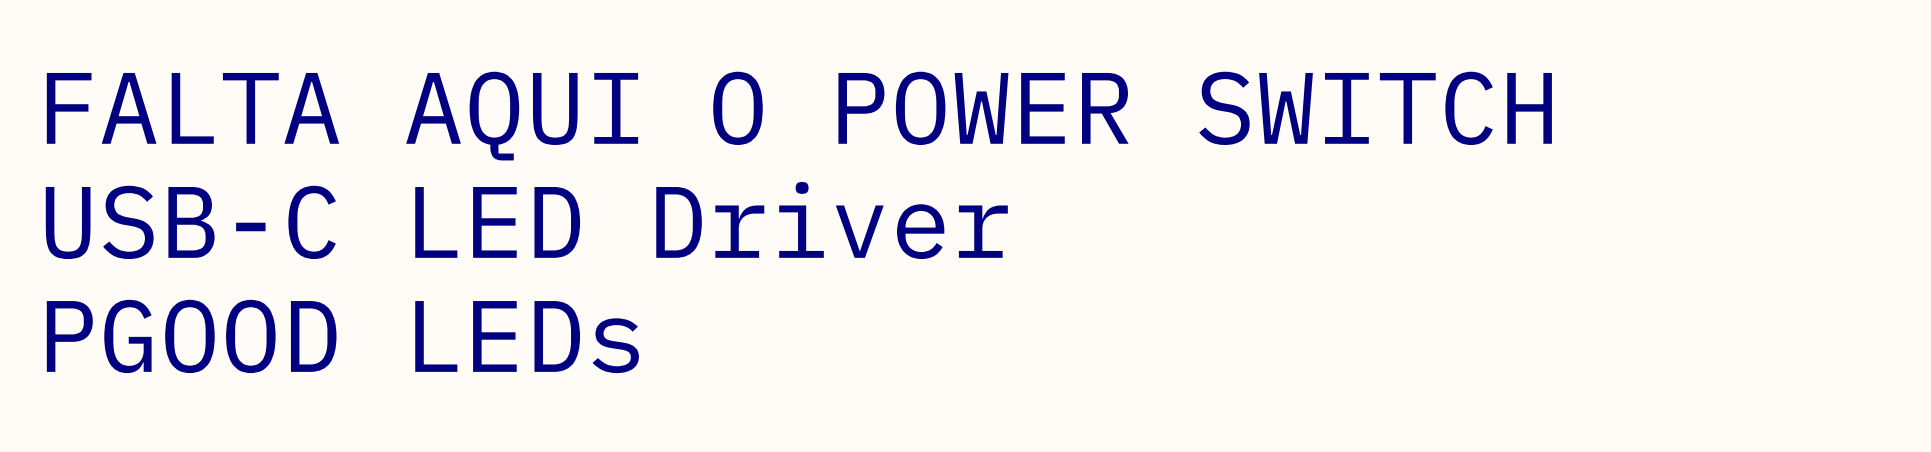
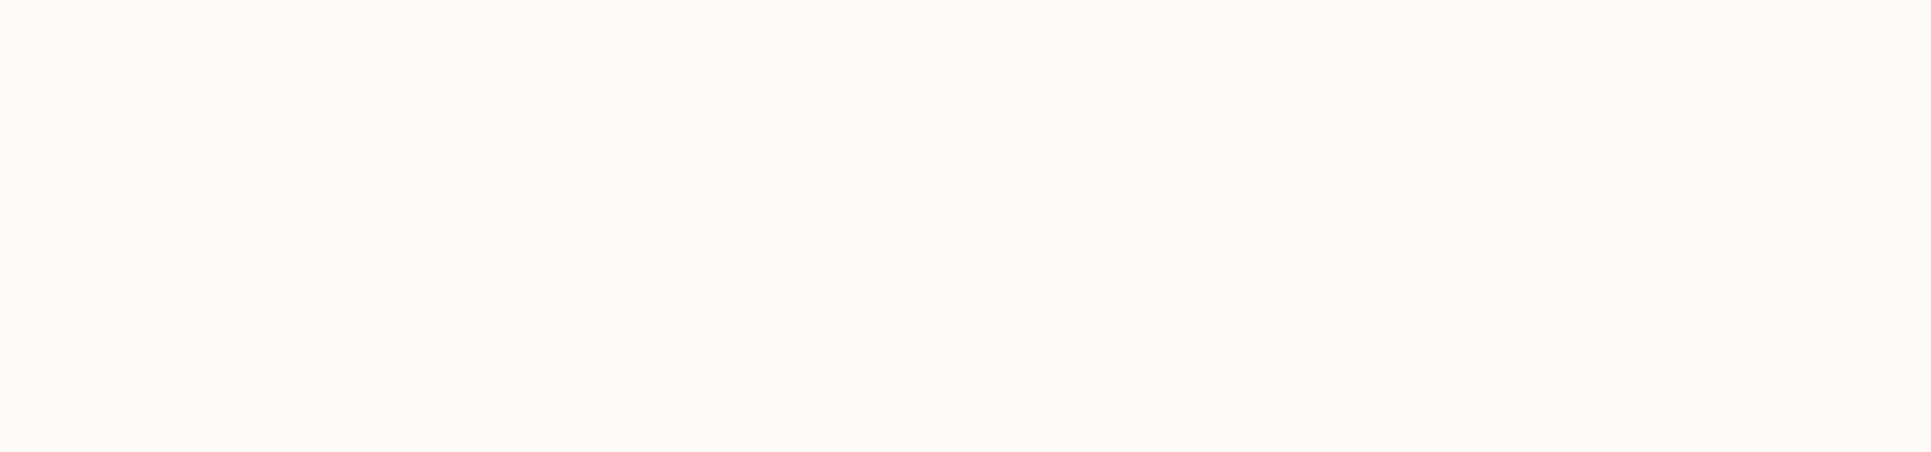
text: FALTA AQUI O POWER SWITCH (799, 116) -> none
text: USB-C LED Driver (526, 220) -> none
text: PGOOD LEDs (342, 336) -> none

